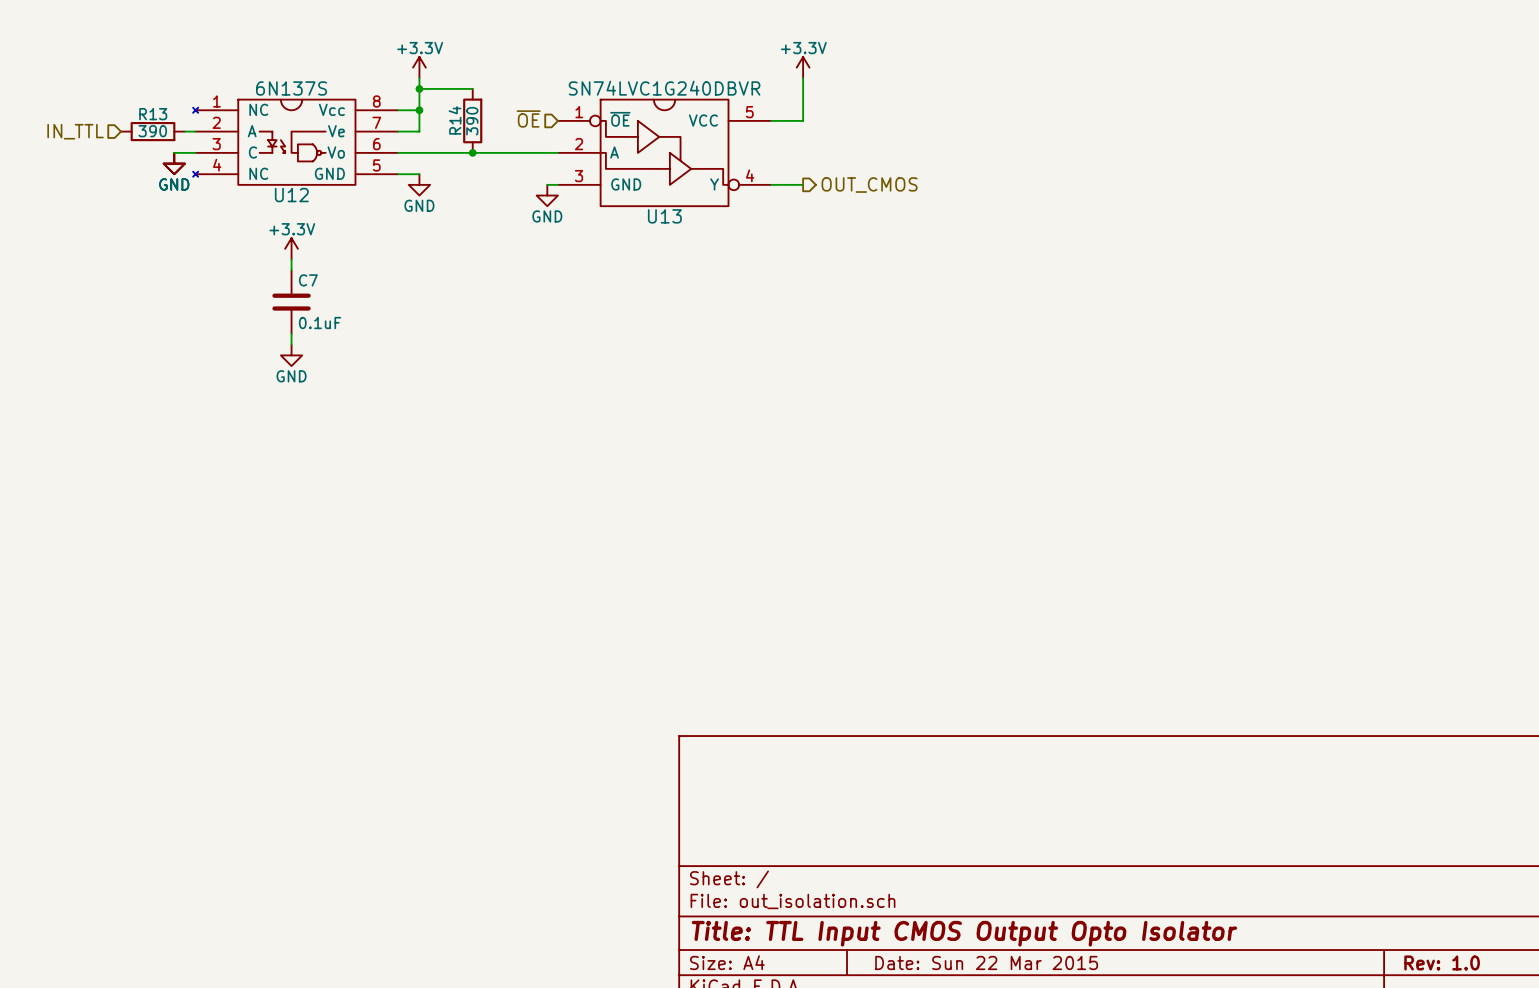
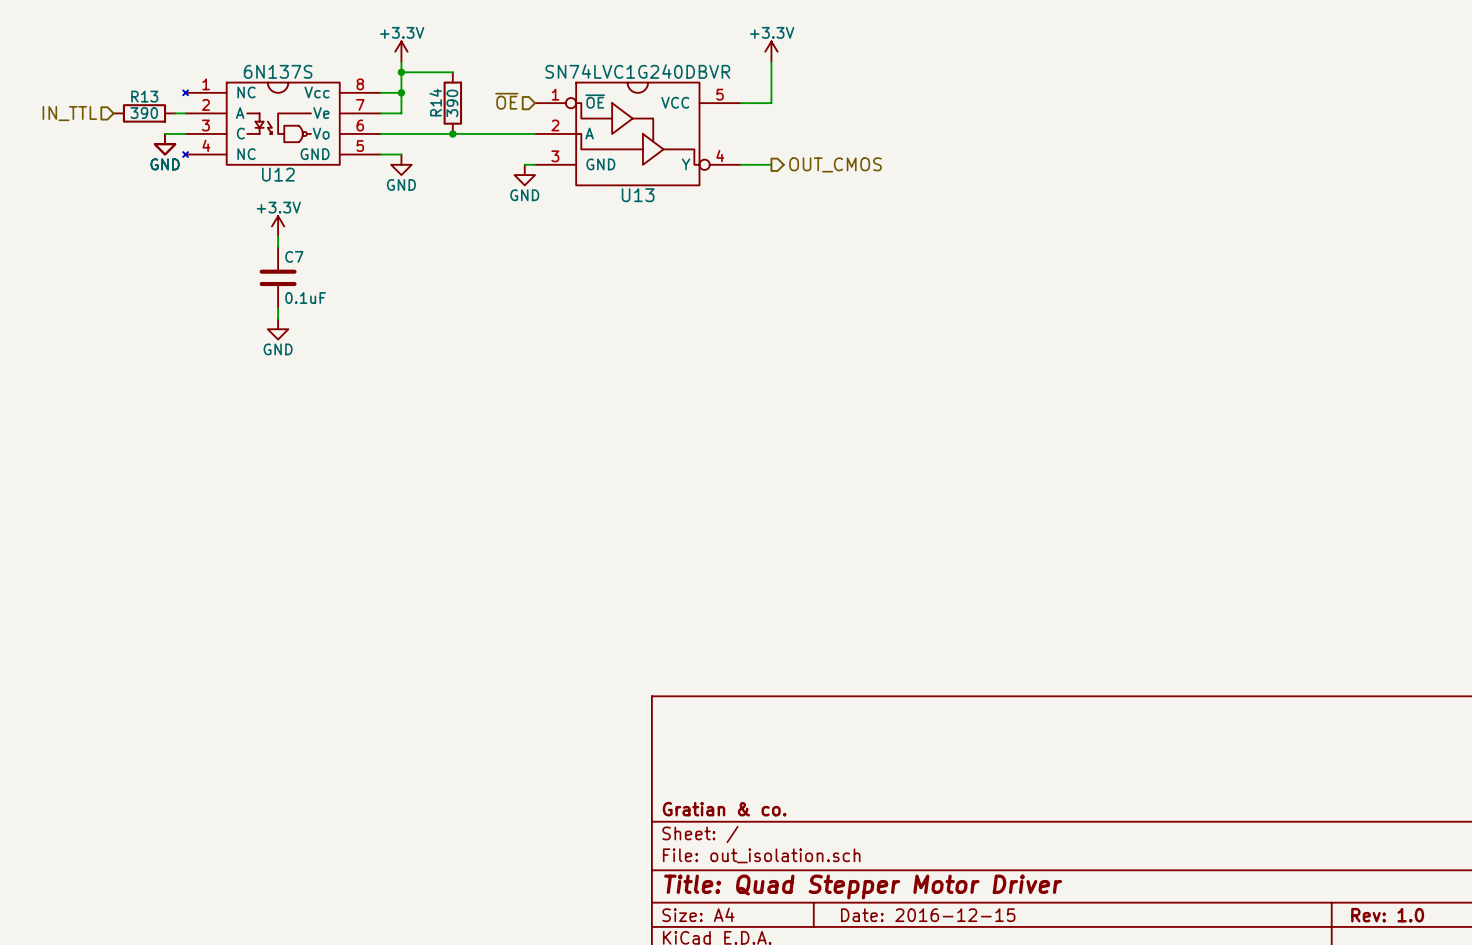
title block: none -> Gratian & co. (724, 809)
title block: Title: TTL Input CMOS Output Opto Isolator (964, 933) -> Title: Quad Stepper Motor Driver (863, 886)
title block: Date: Sun 22 Mar 2015 (986, 962) -> Date: 2016-12-15 (928, 915)

